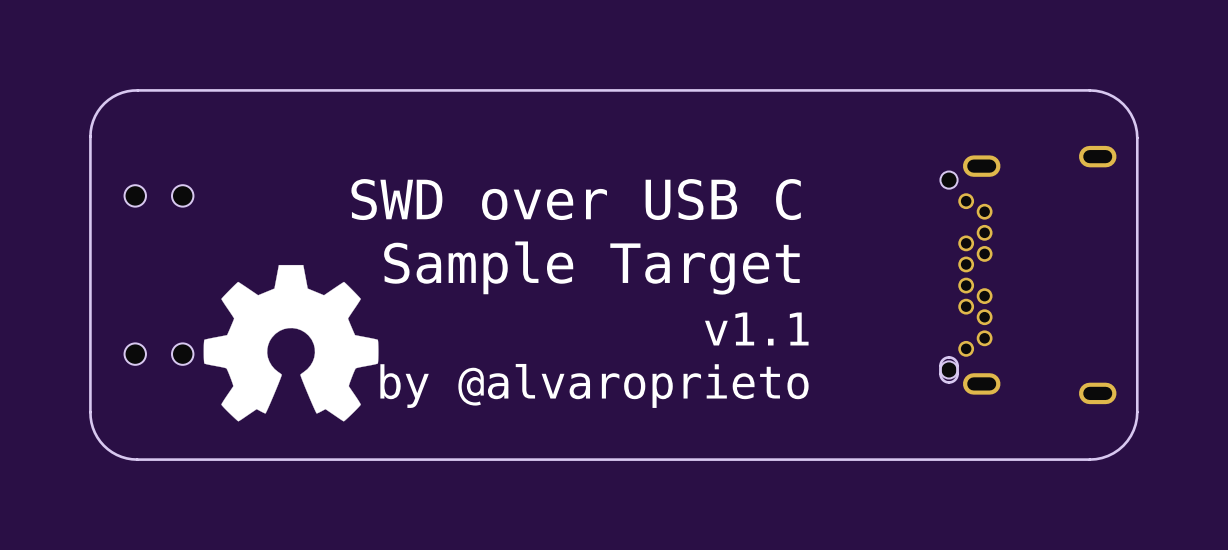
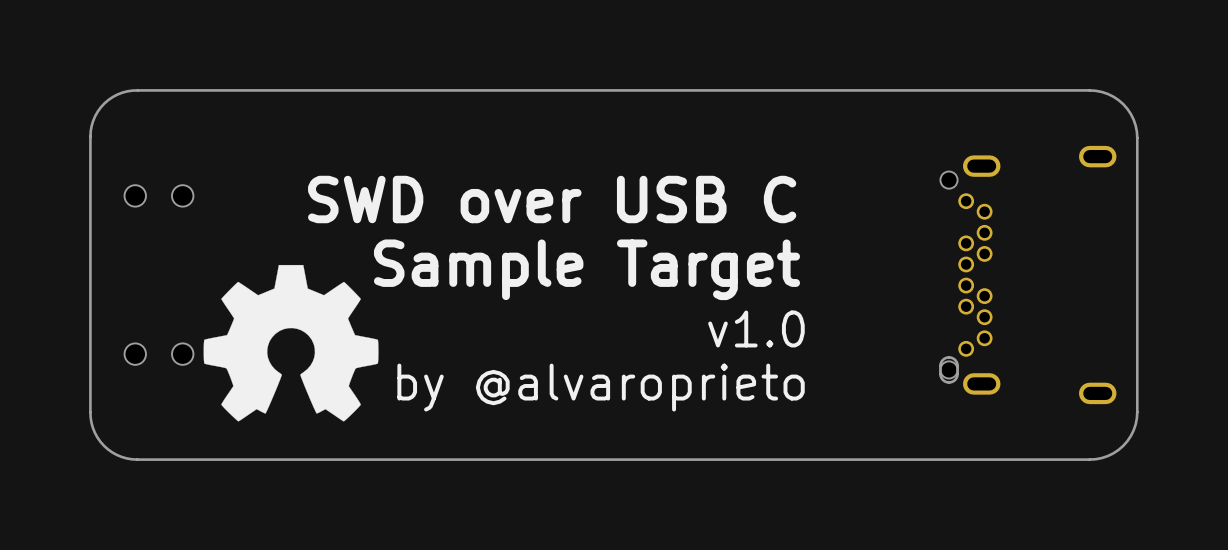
text: v1.1 (756, 328) -> v1.0 (756, 328)

